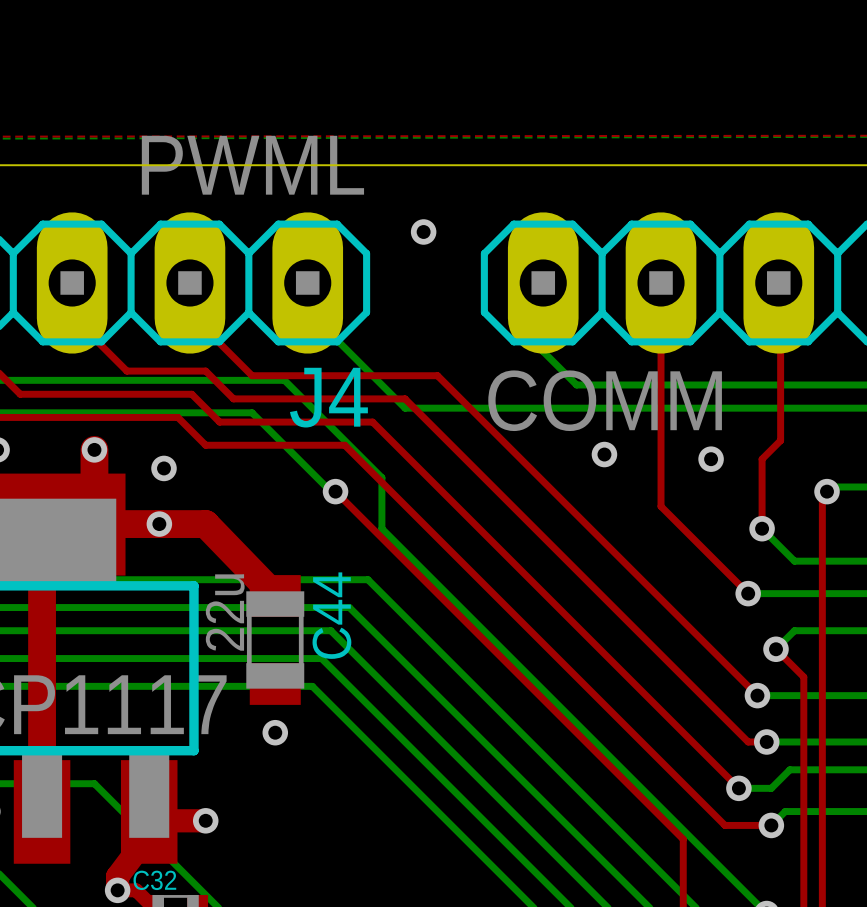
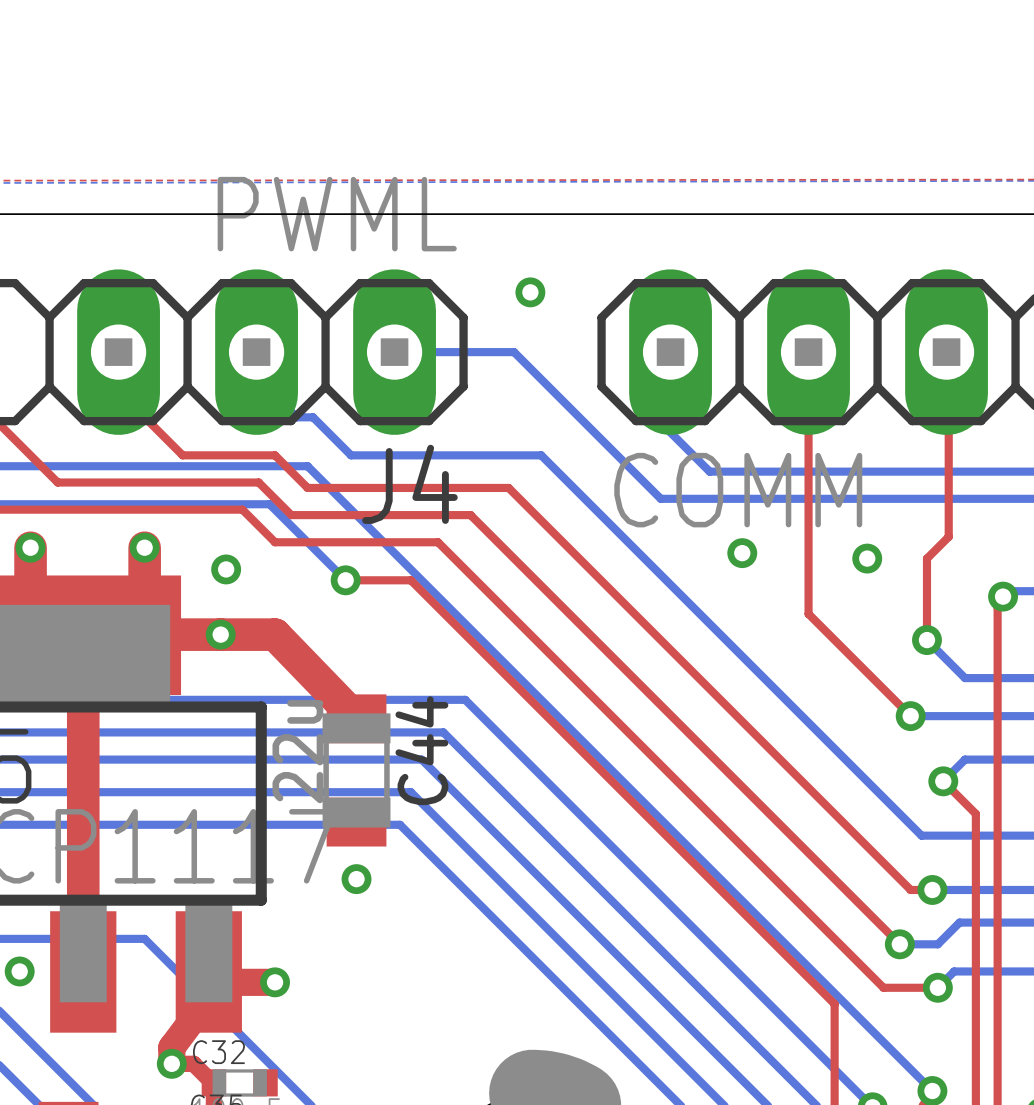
top track: (189, 282) (189, 313) (252, 375) (437, 375) (757, 695) -> none
bottom track: none -> (256, 352) (285, 381) (285, 406) (296, 417) (313, 417) (351, 455) (541, 455) (921, 835)
bottom track: (307, 282) (307, 310) (405, 408) (534, 408) -> (394, 352) (514, 352) (660, 498)
bottom track: (233, 380) (284, 380) (381, 477) (381, 528) -> (307, 466) (481, 640)
bottom track: (201, 412) (252, 412) (330, 491) (335, 491) -> (269, 504) (345, 580)
top track: none -> (345, 580) (410, 580) (427, 596)
via position: (335, 491) -> (345, 580)
via: (757, 695) -> none

